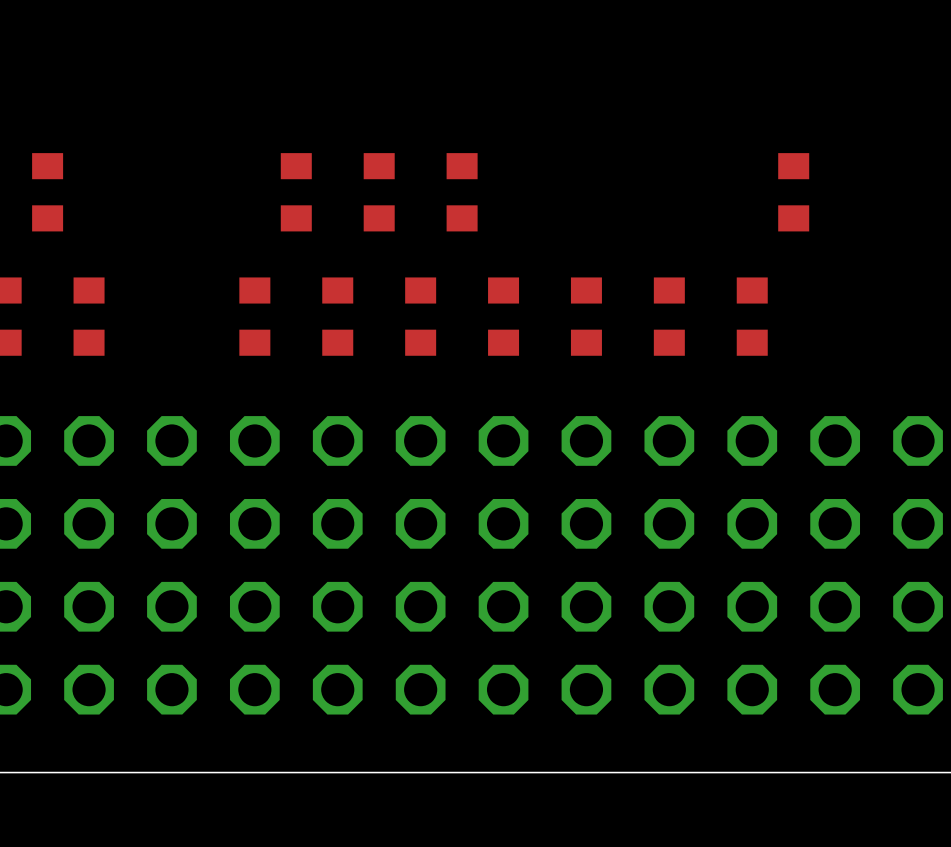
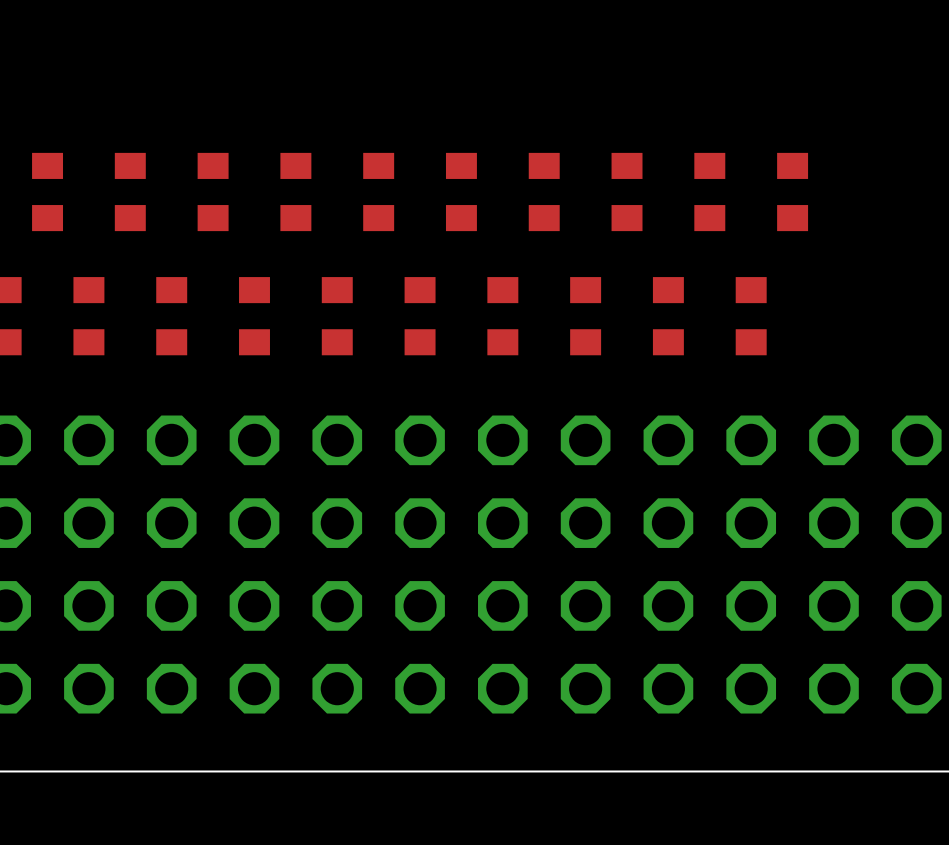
part: none -> (130, 191)
part: none -> (213, 191)
part: none -> (544, 191)
part: none -> (627, 191)
part: none -> (709, 191)
part: none -> (171, 316)

